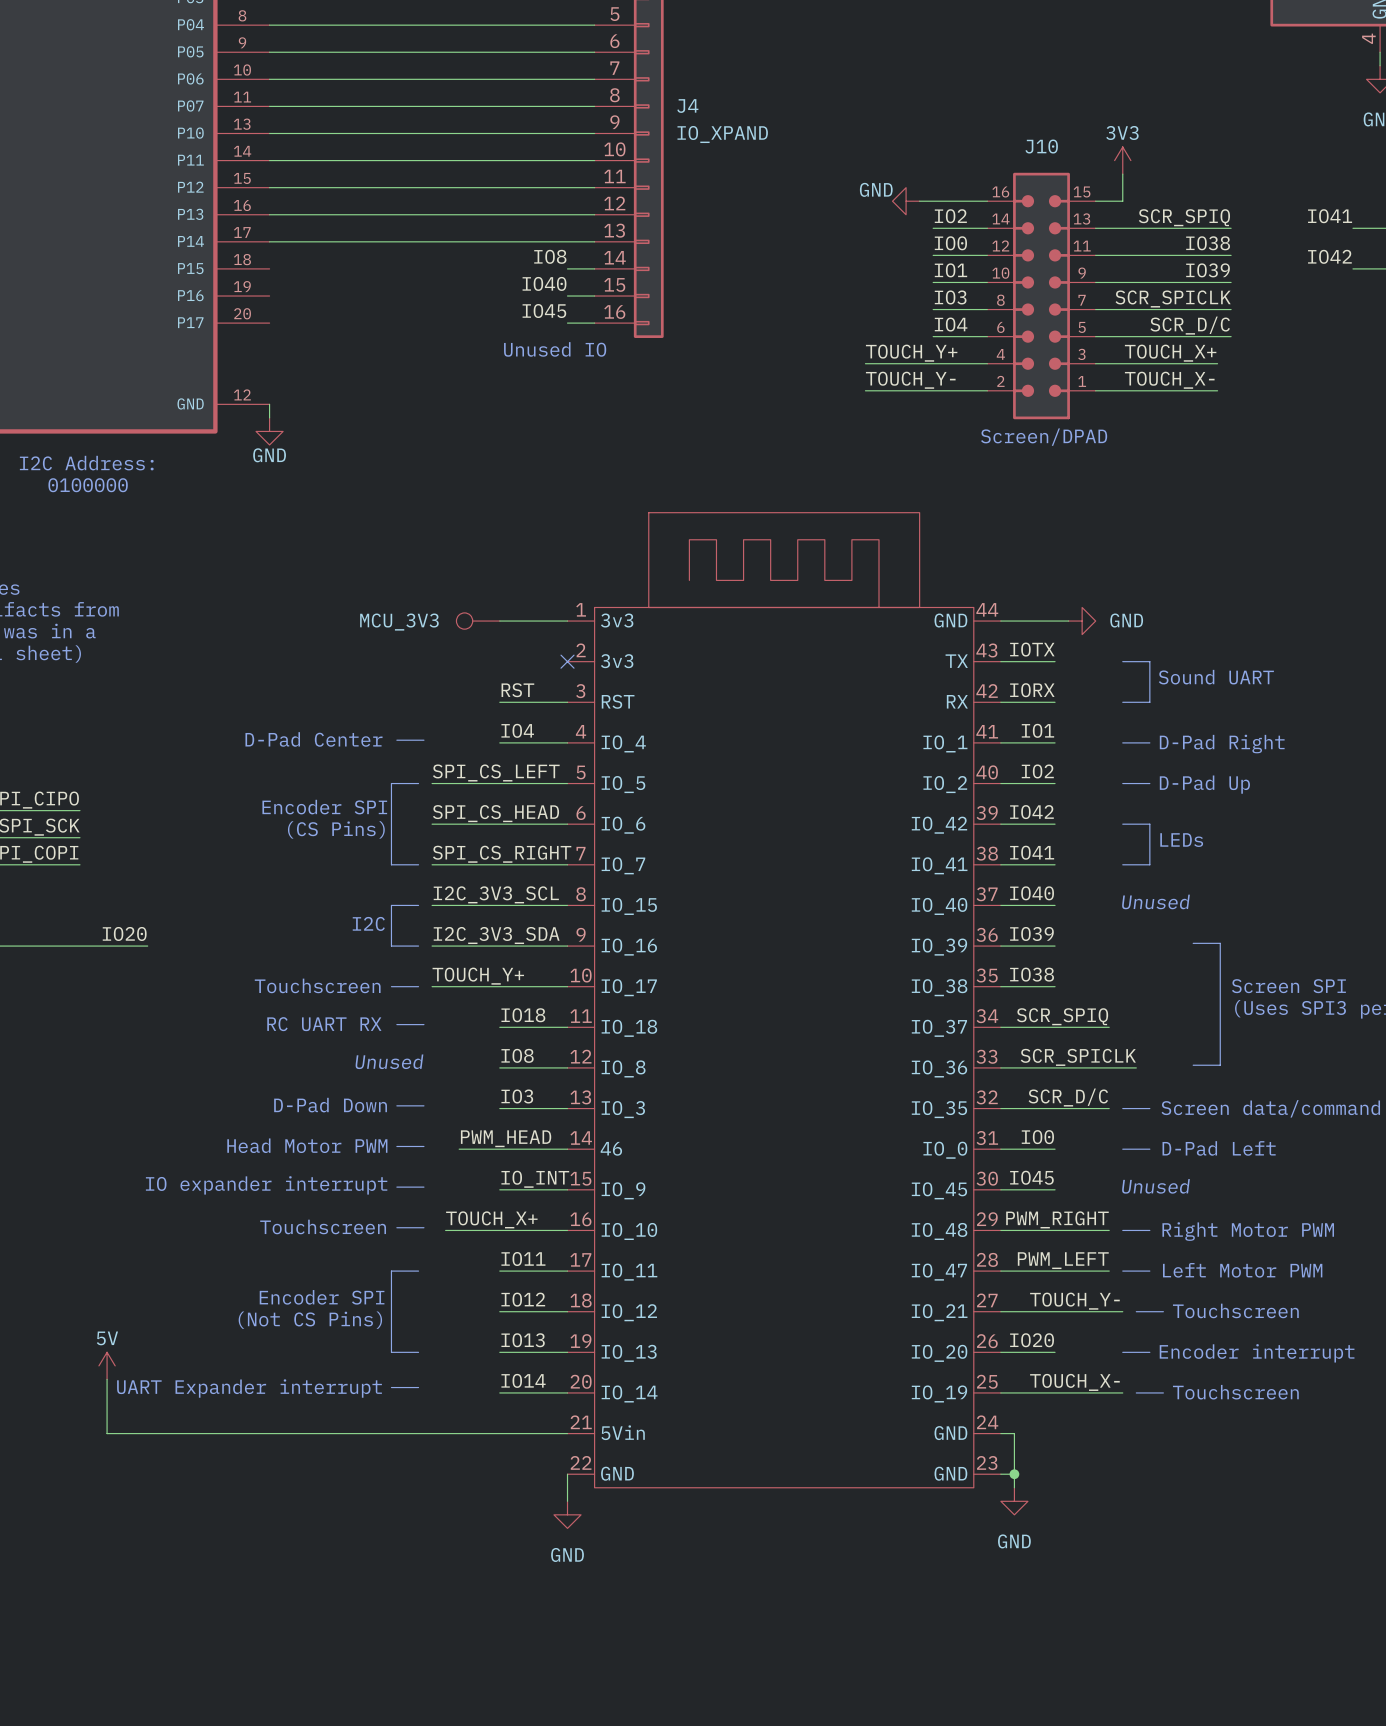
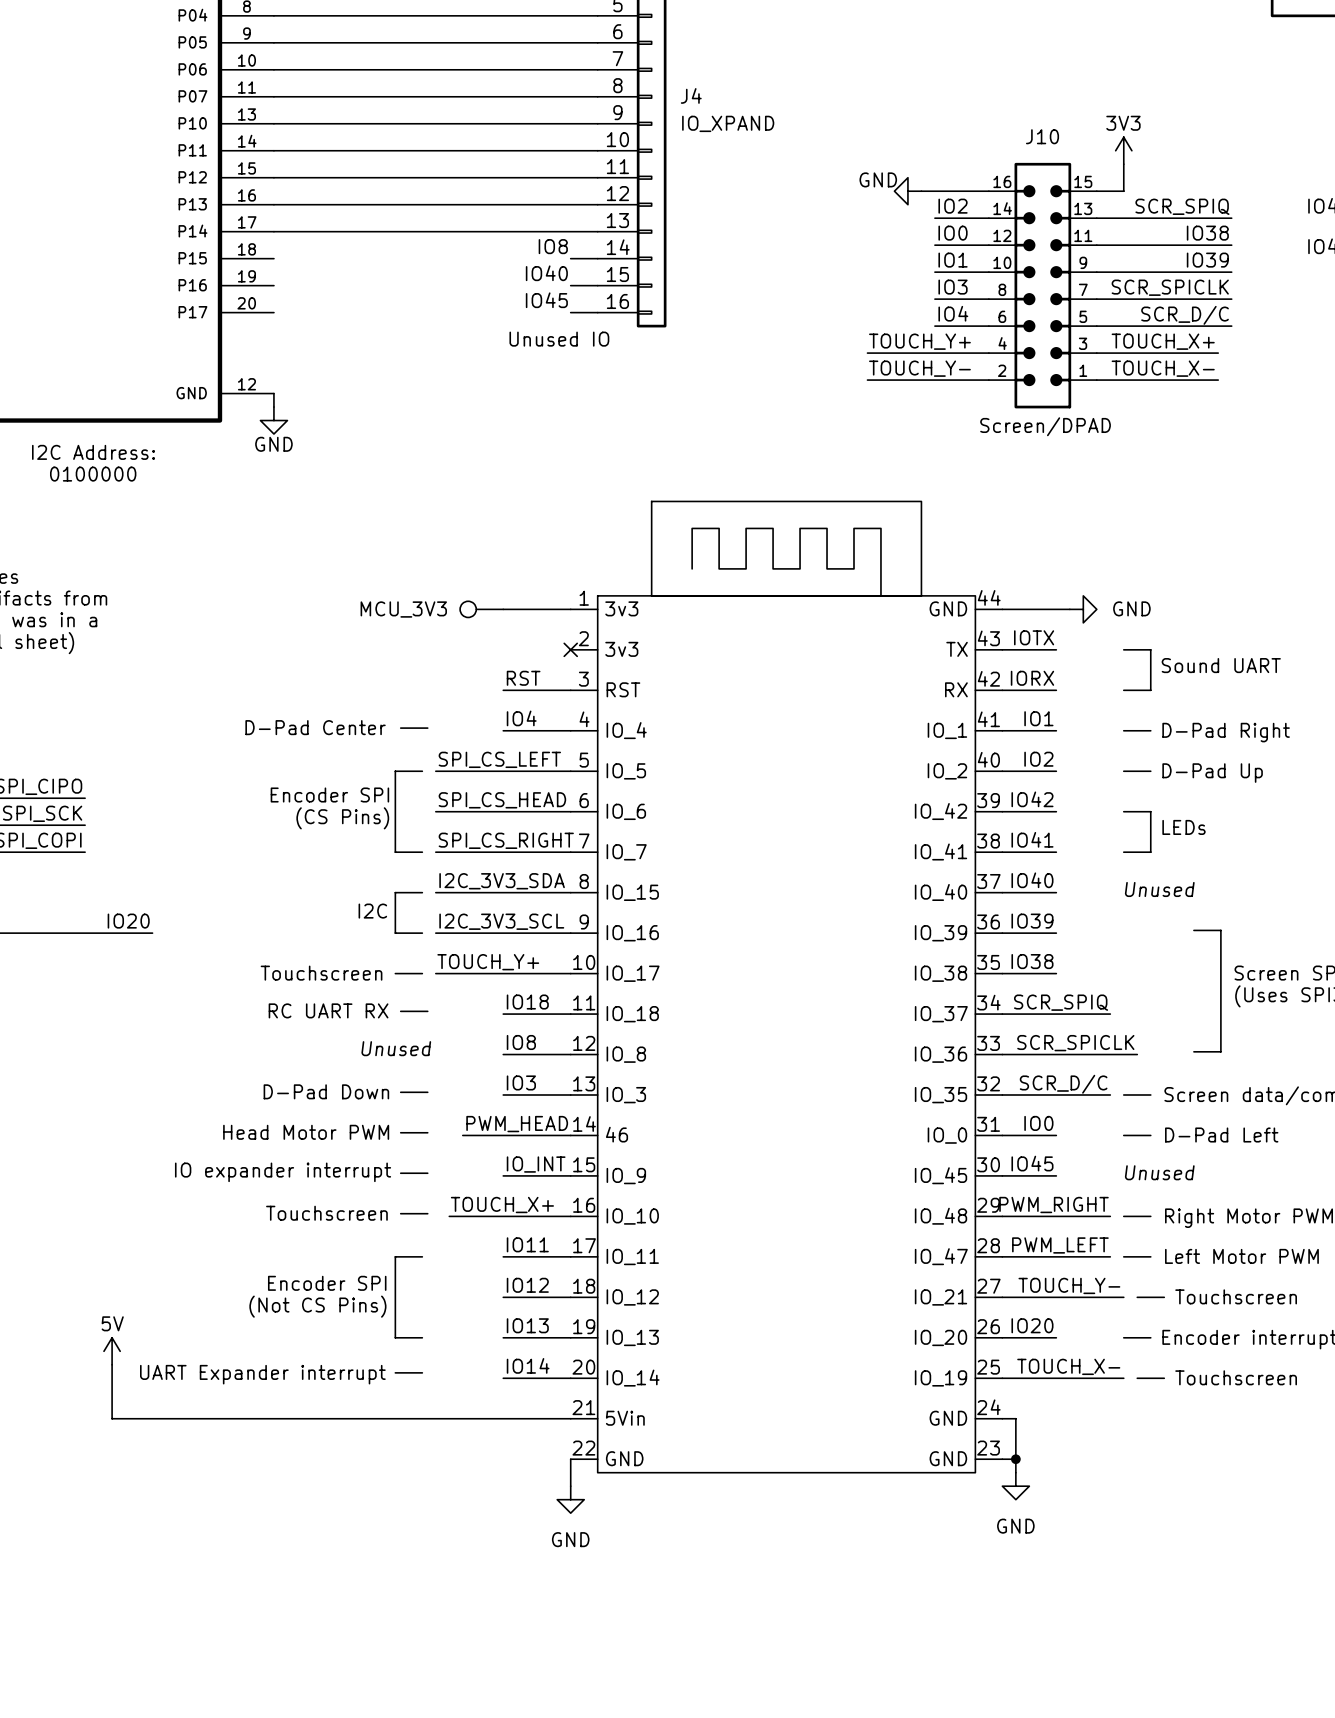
label: I2C_3V3_SCL (496, 894) -> I2C_3V3_SDA (502, 881)
label: I2C_3V3_SDA (496, 935) -> I2C_3V3_SCL (501, 921)

